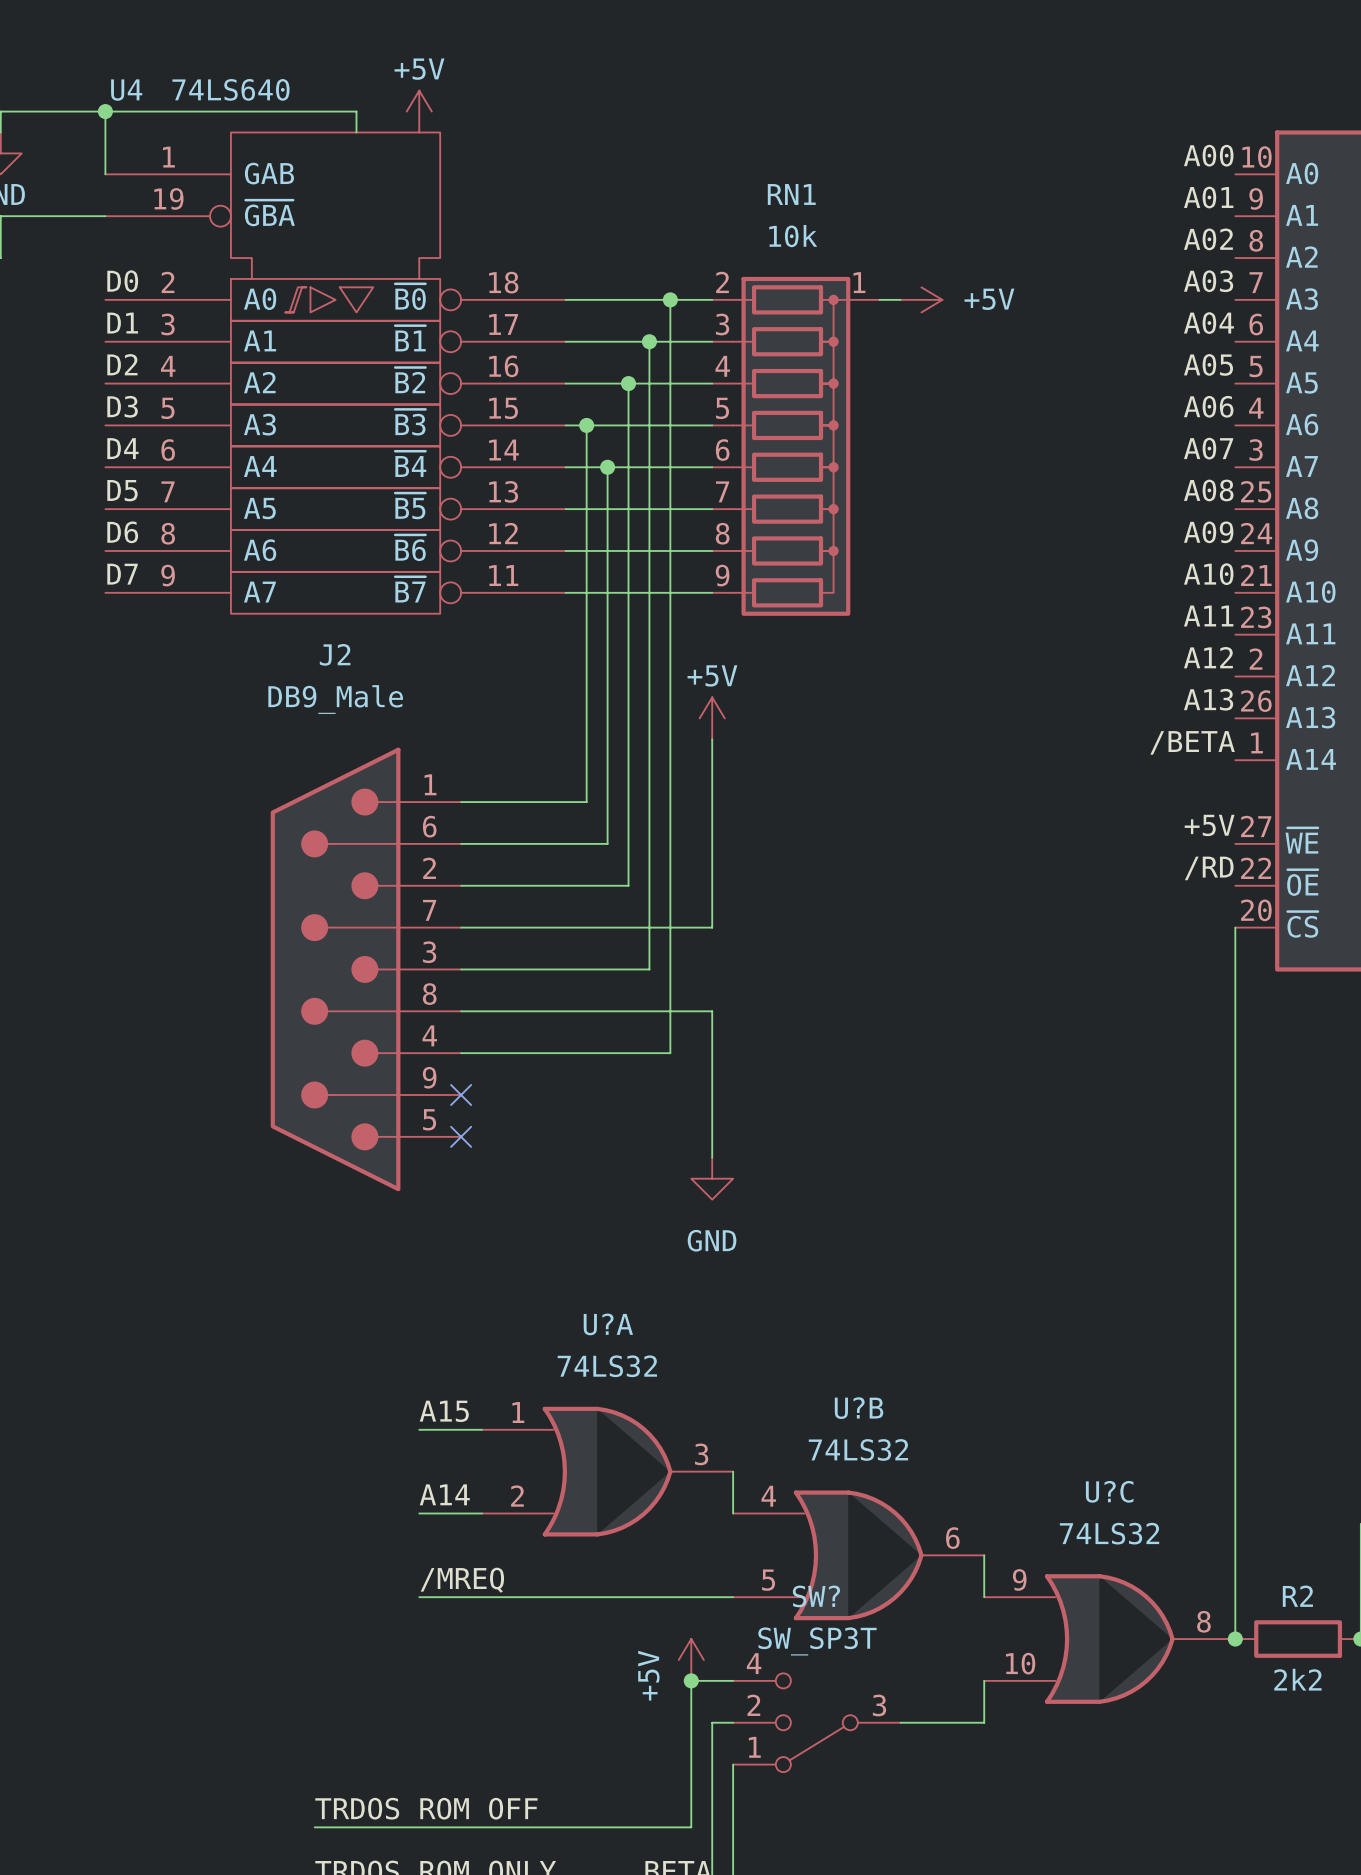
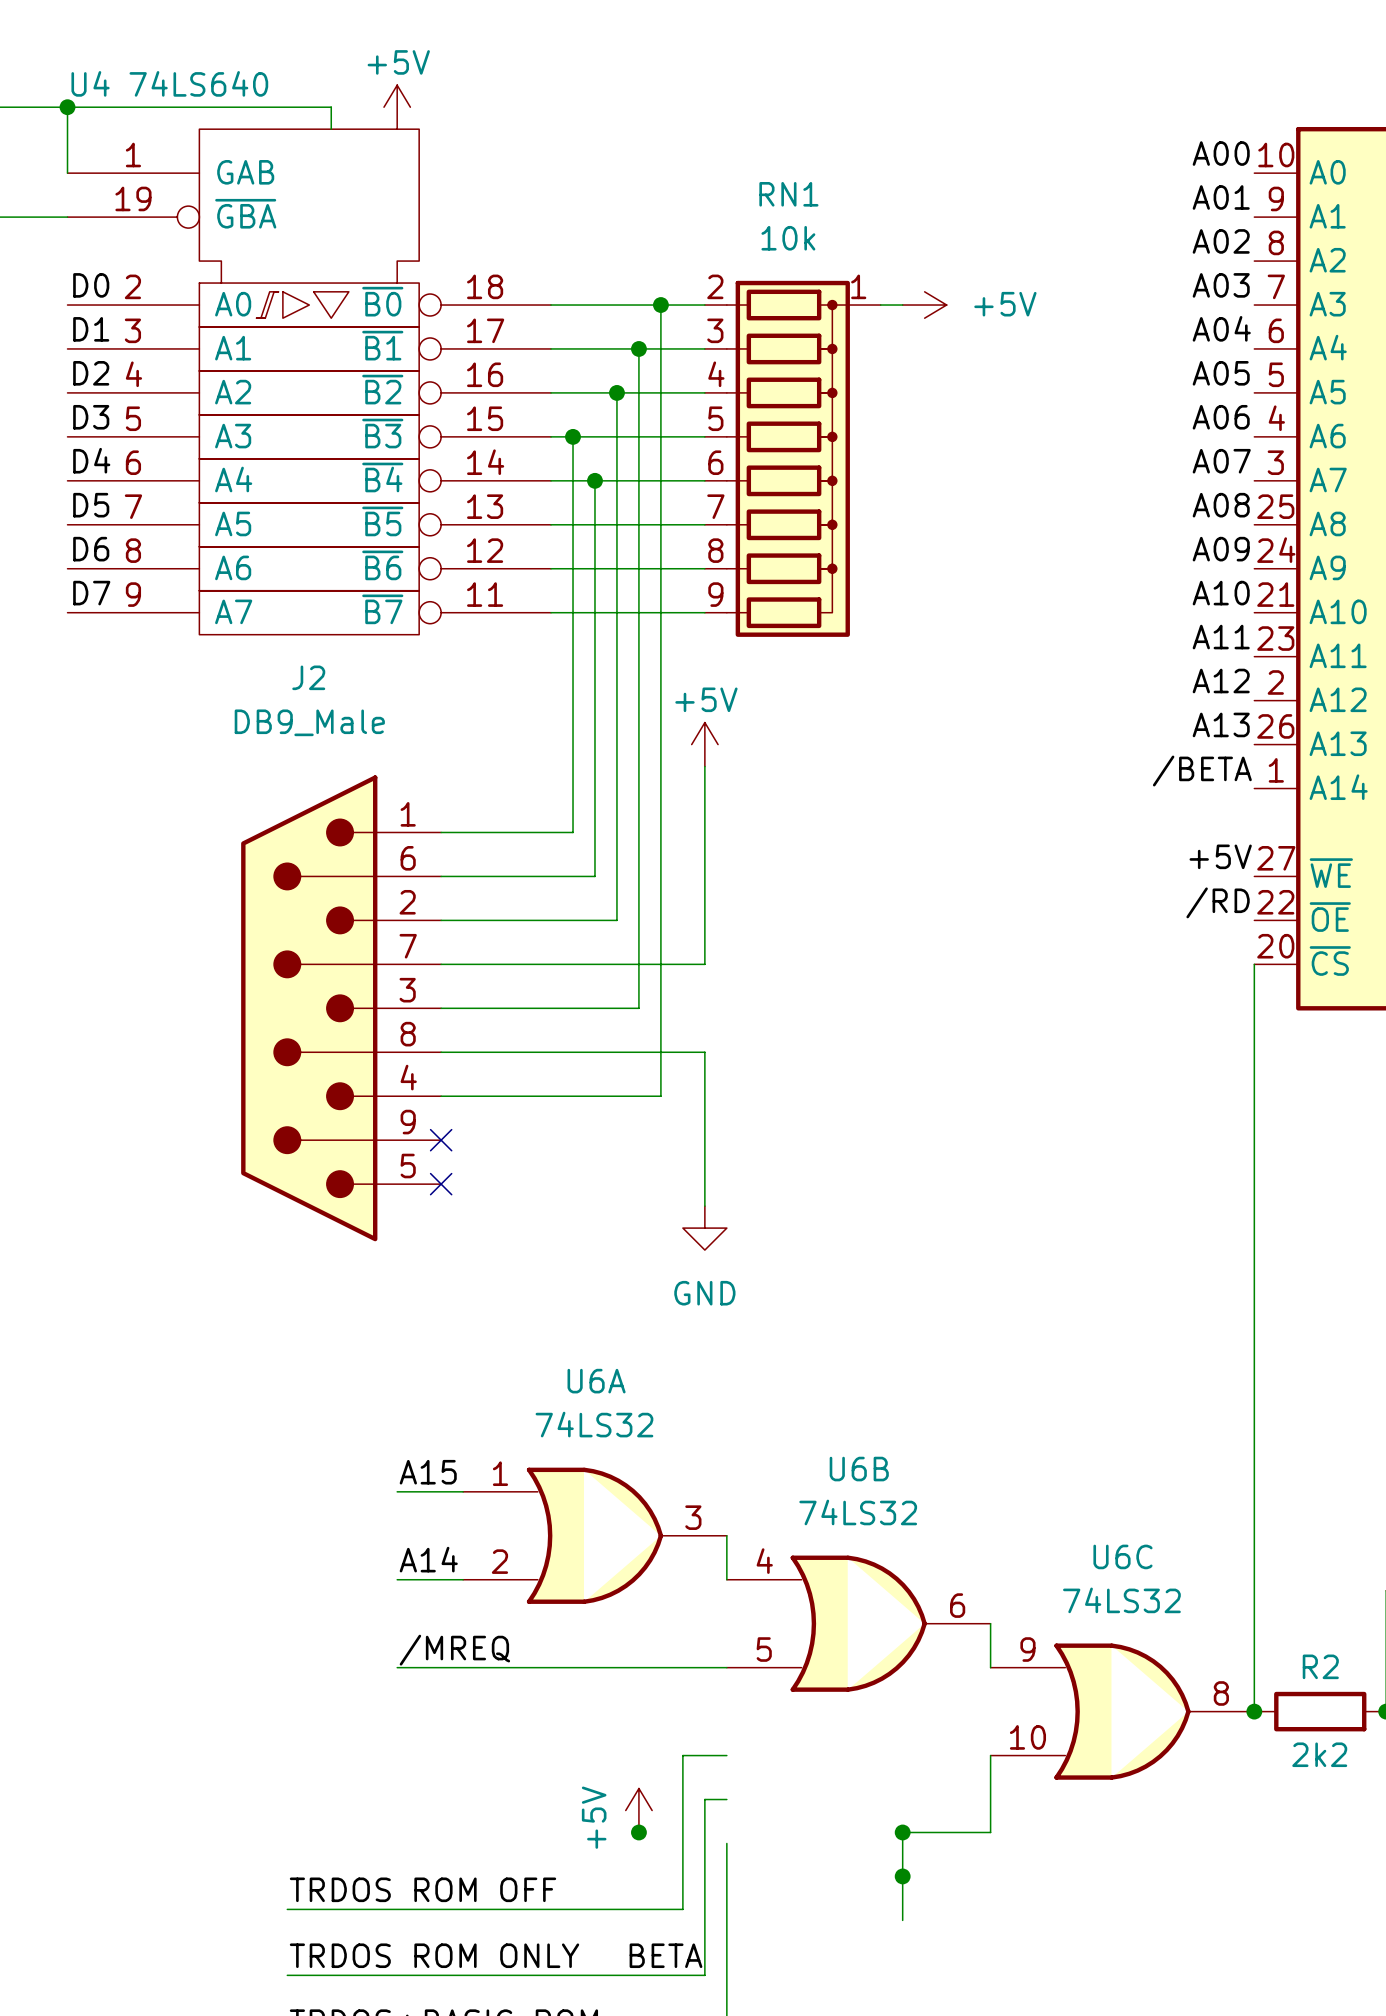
U?A name: U?A (608, 1324) -> U6A (596, 1381)
U?B name: U?B (859, 1408) -> U6B (859, 1469)
U?C name: U?C (1109, 1491) -> U6C (1122, 1556)
power symbol position: +5V (691, 1659) -> +5V (638, 1810)
junction position: (691, 1680) -> (638, 1832)
SW?: SW_SP3T (816, 1722) -> none
wire: (900, 1722) (984, 1722) -> (902, 1920) (902, 1832) (990, 1832) (990, 1799)
junction: none -> (902, 1832)
junction: none -> (902, 1876)

